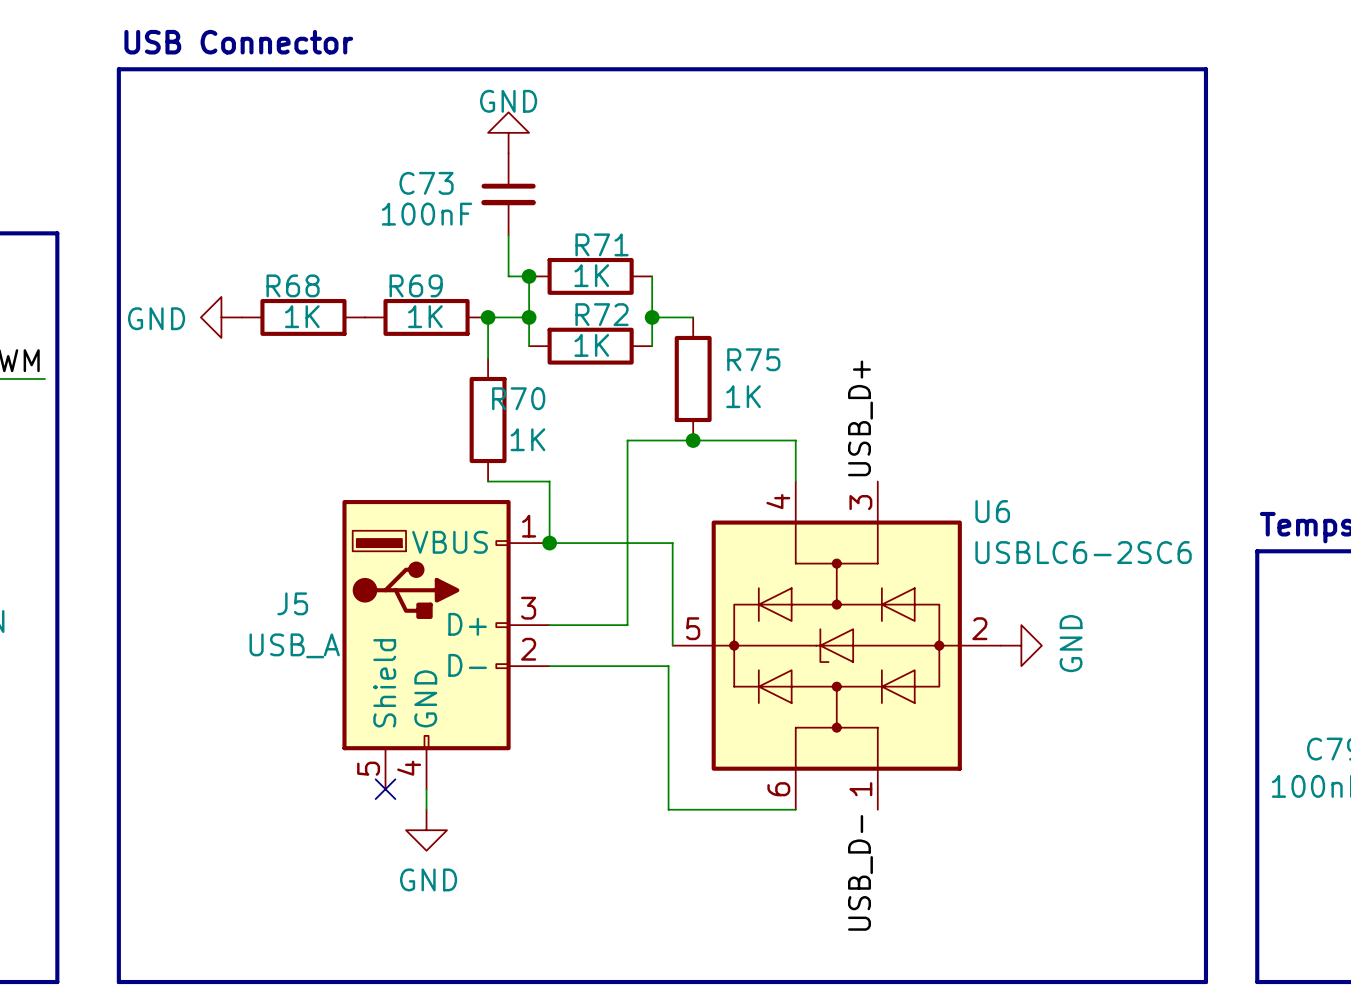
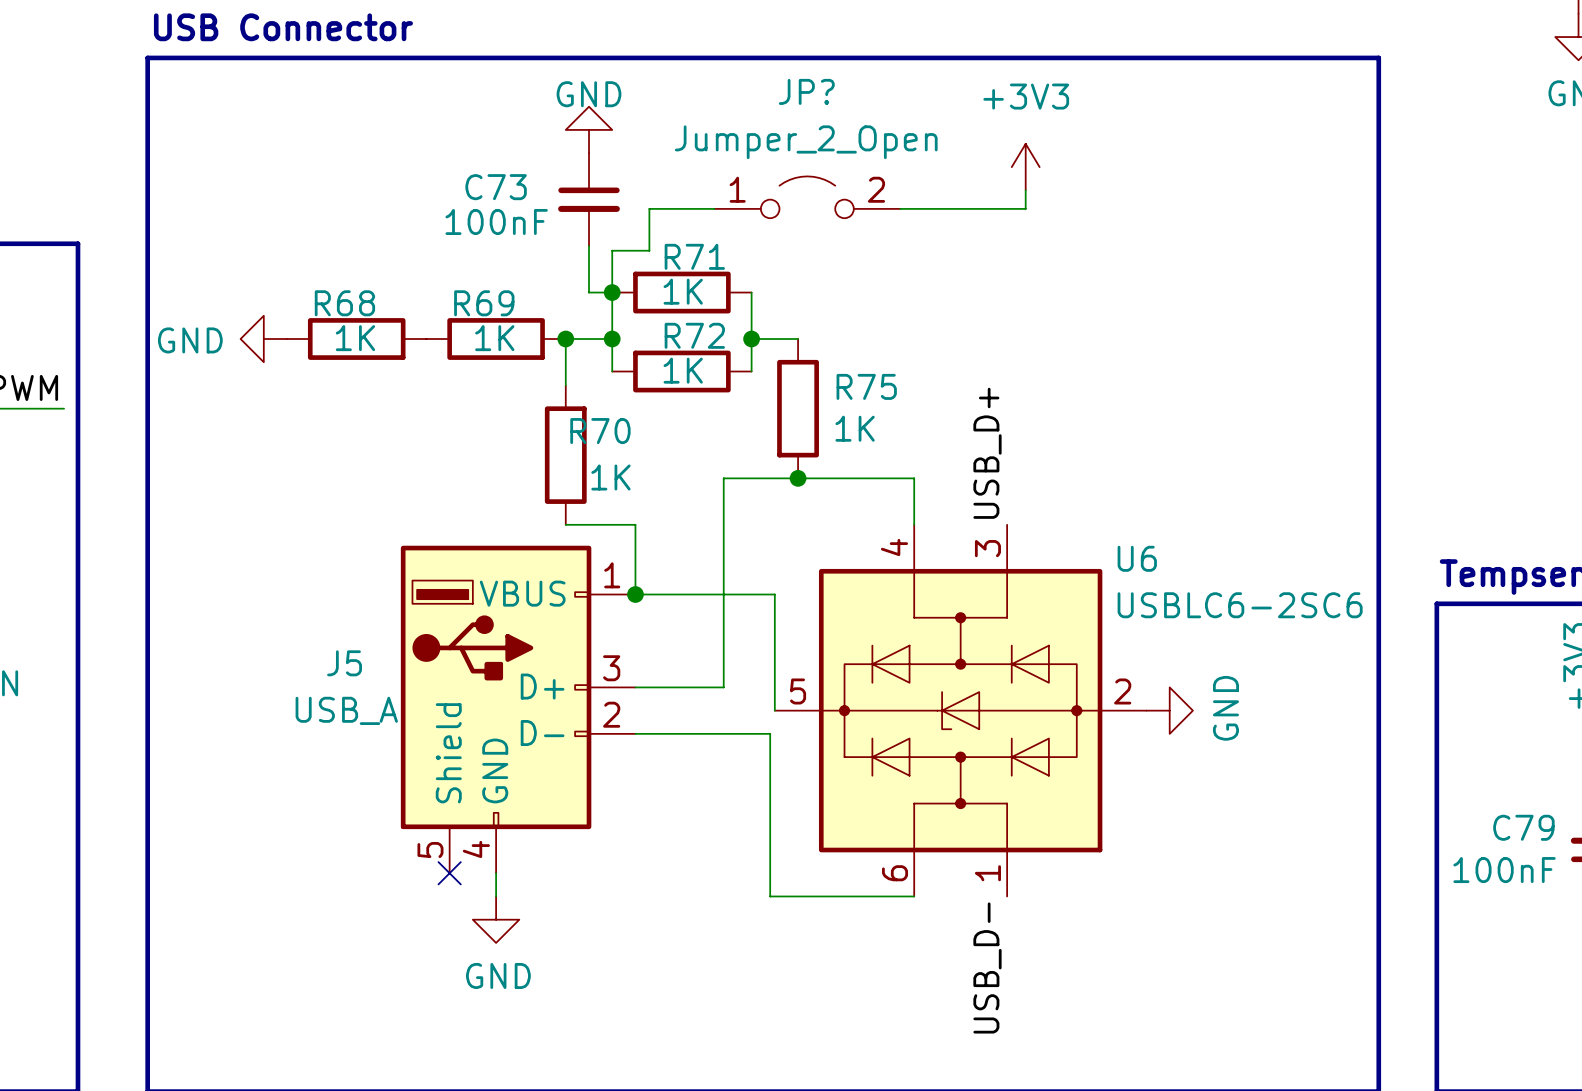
power symbol: none -> +3V3 (1025, 167)
wire: none -> (1025, 190) (1025, 208) (900, 208)
JP?: none -> Jumper_2_Open (807, 197)
wire: none -> (714, 208) (649, 208) (649, 250) (612, 250) (612, 292)

